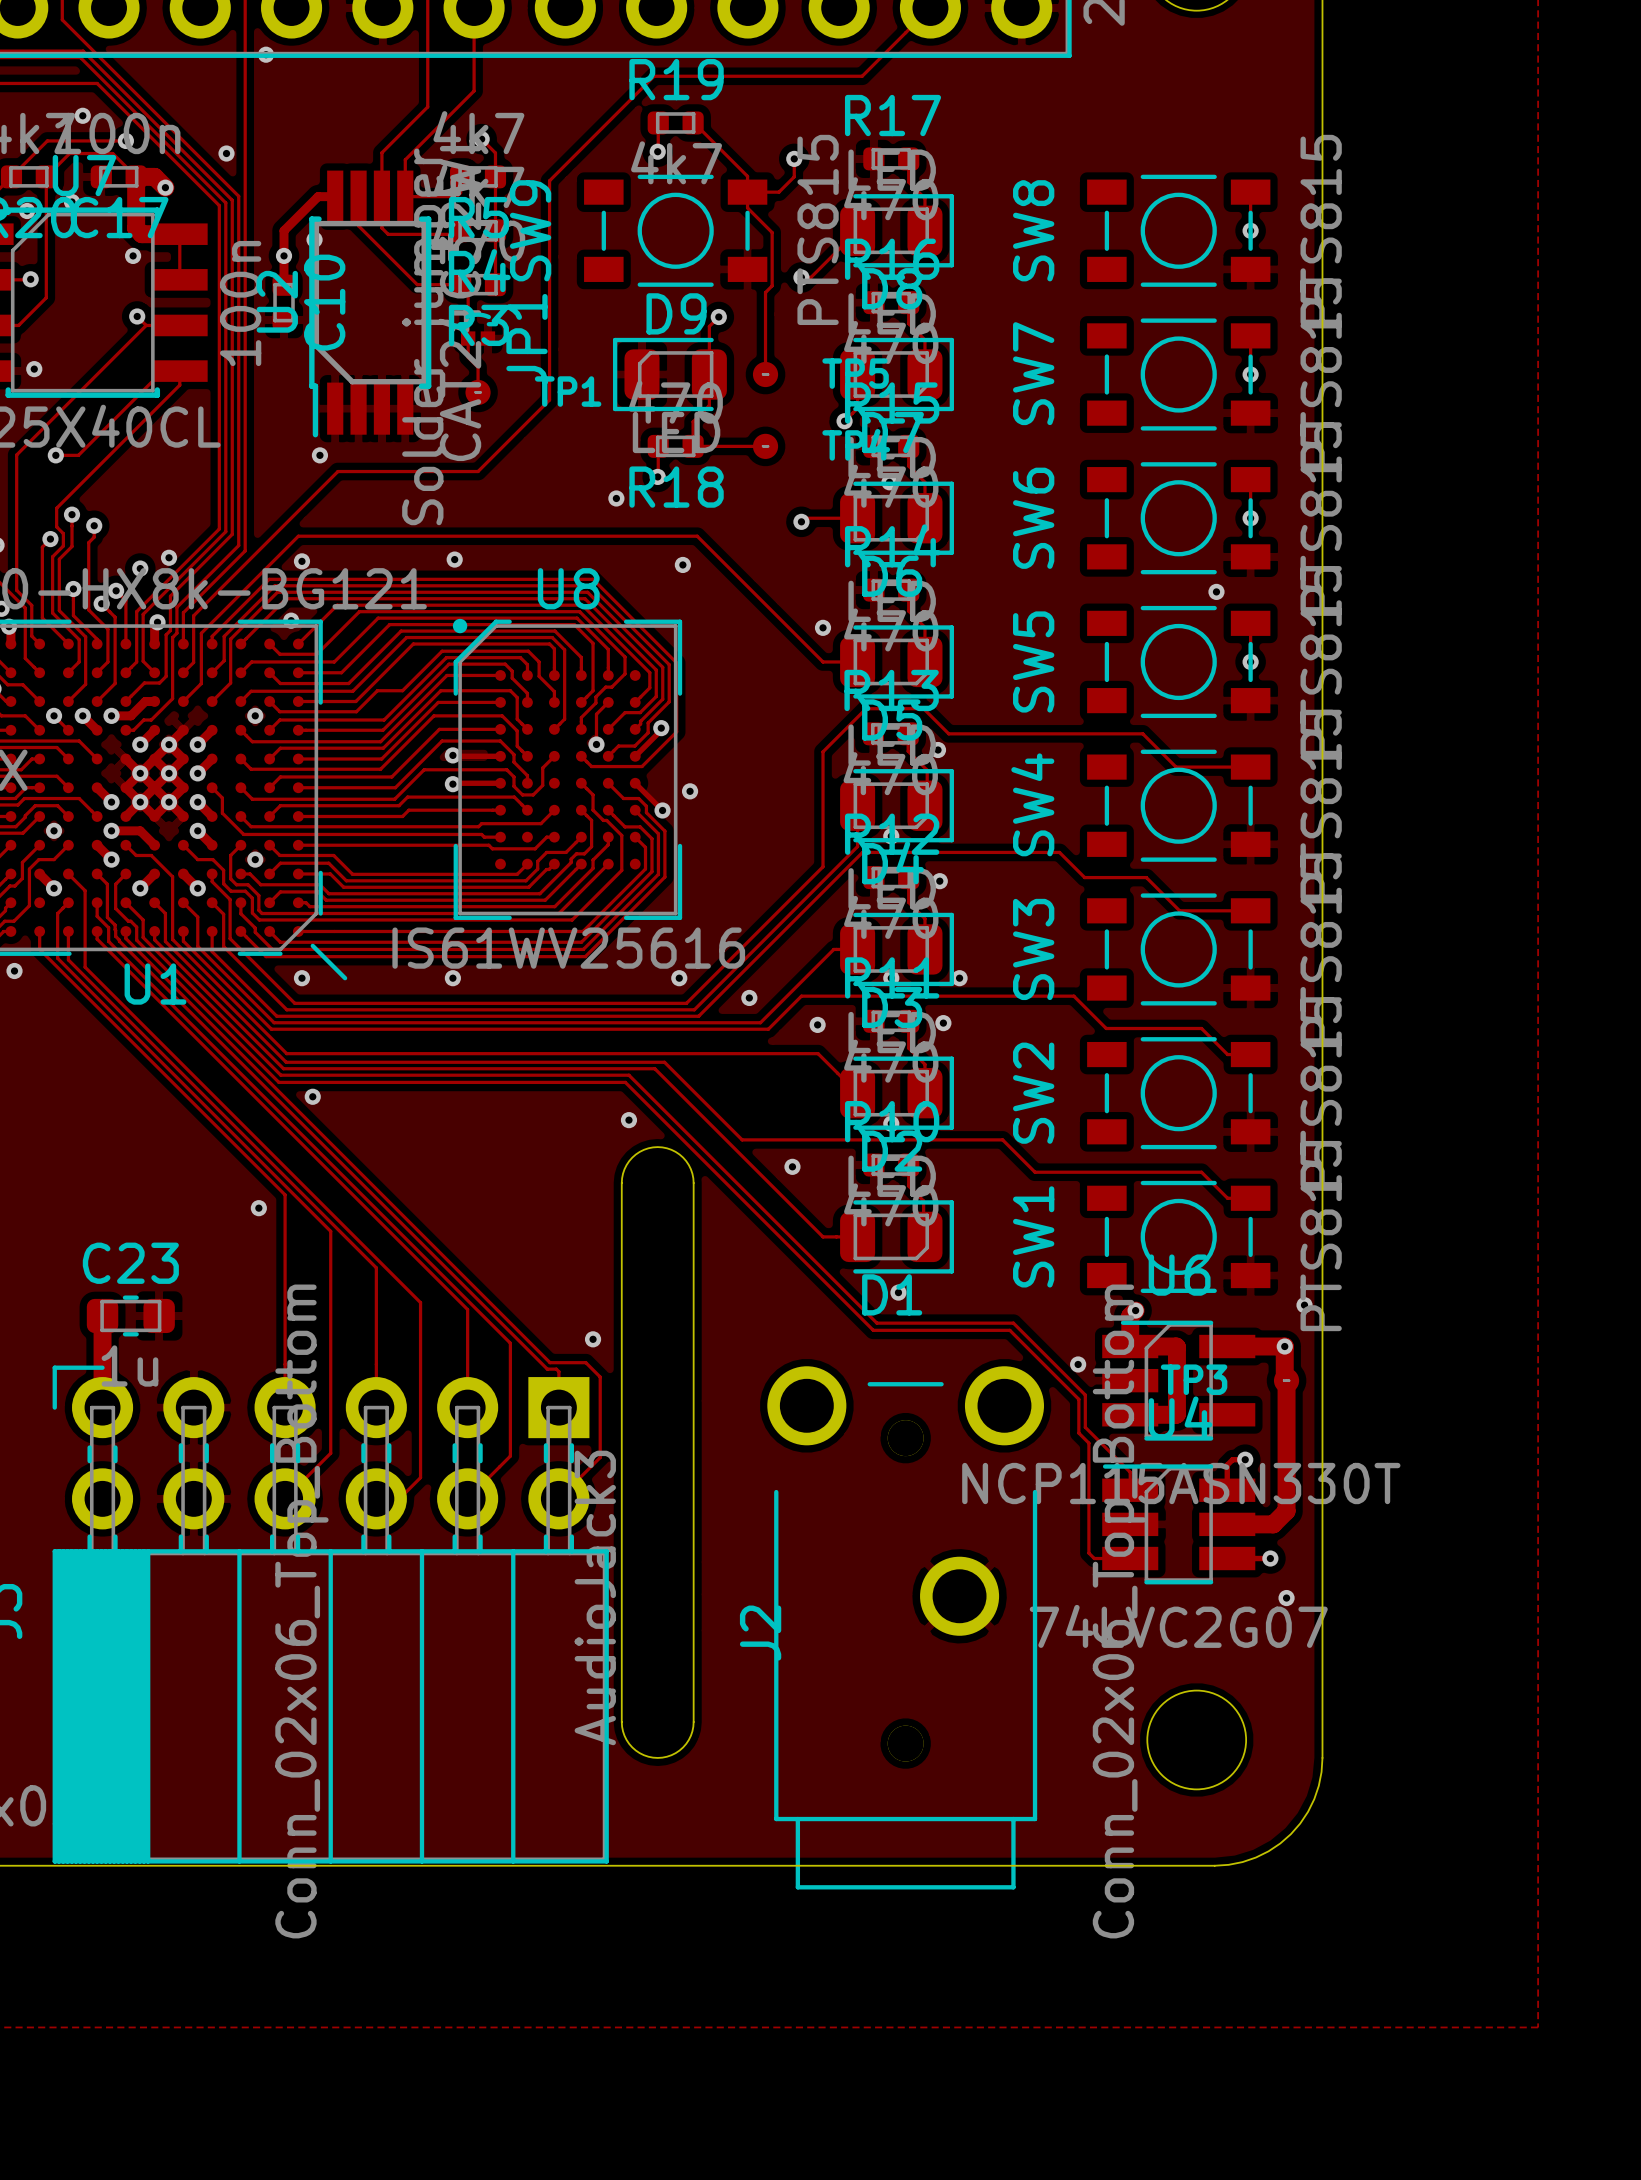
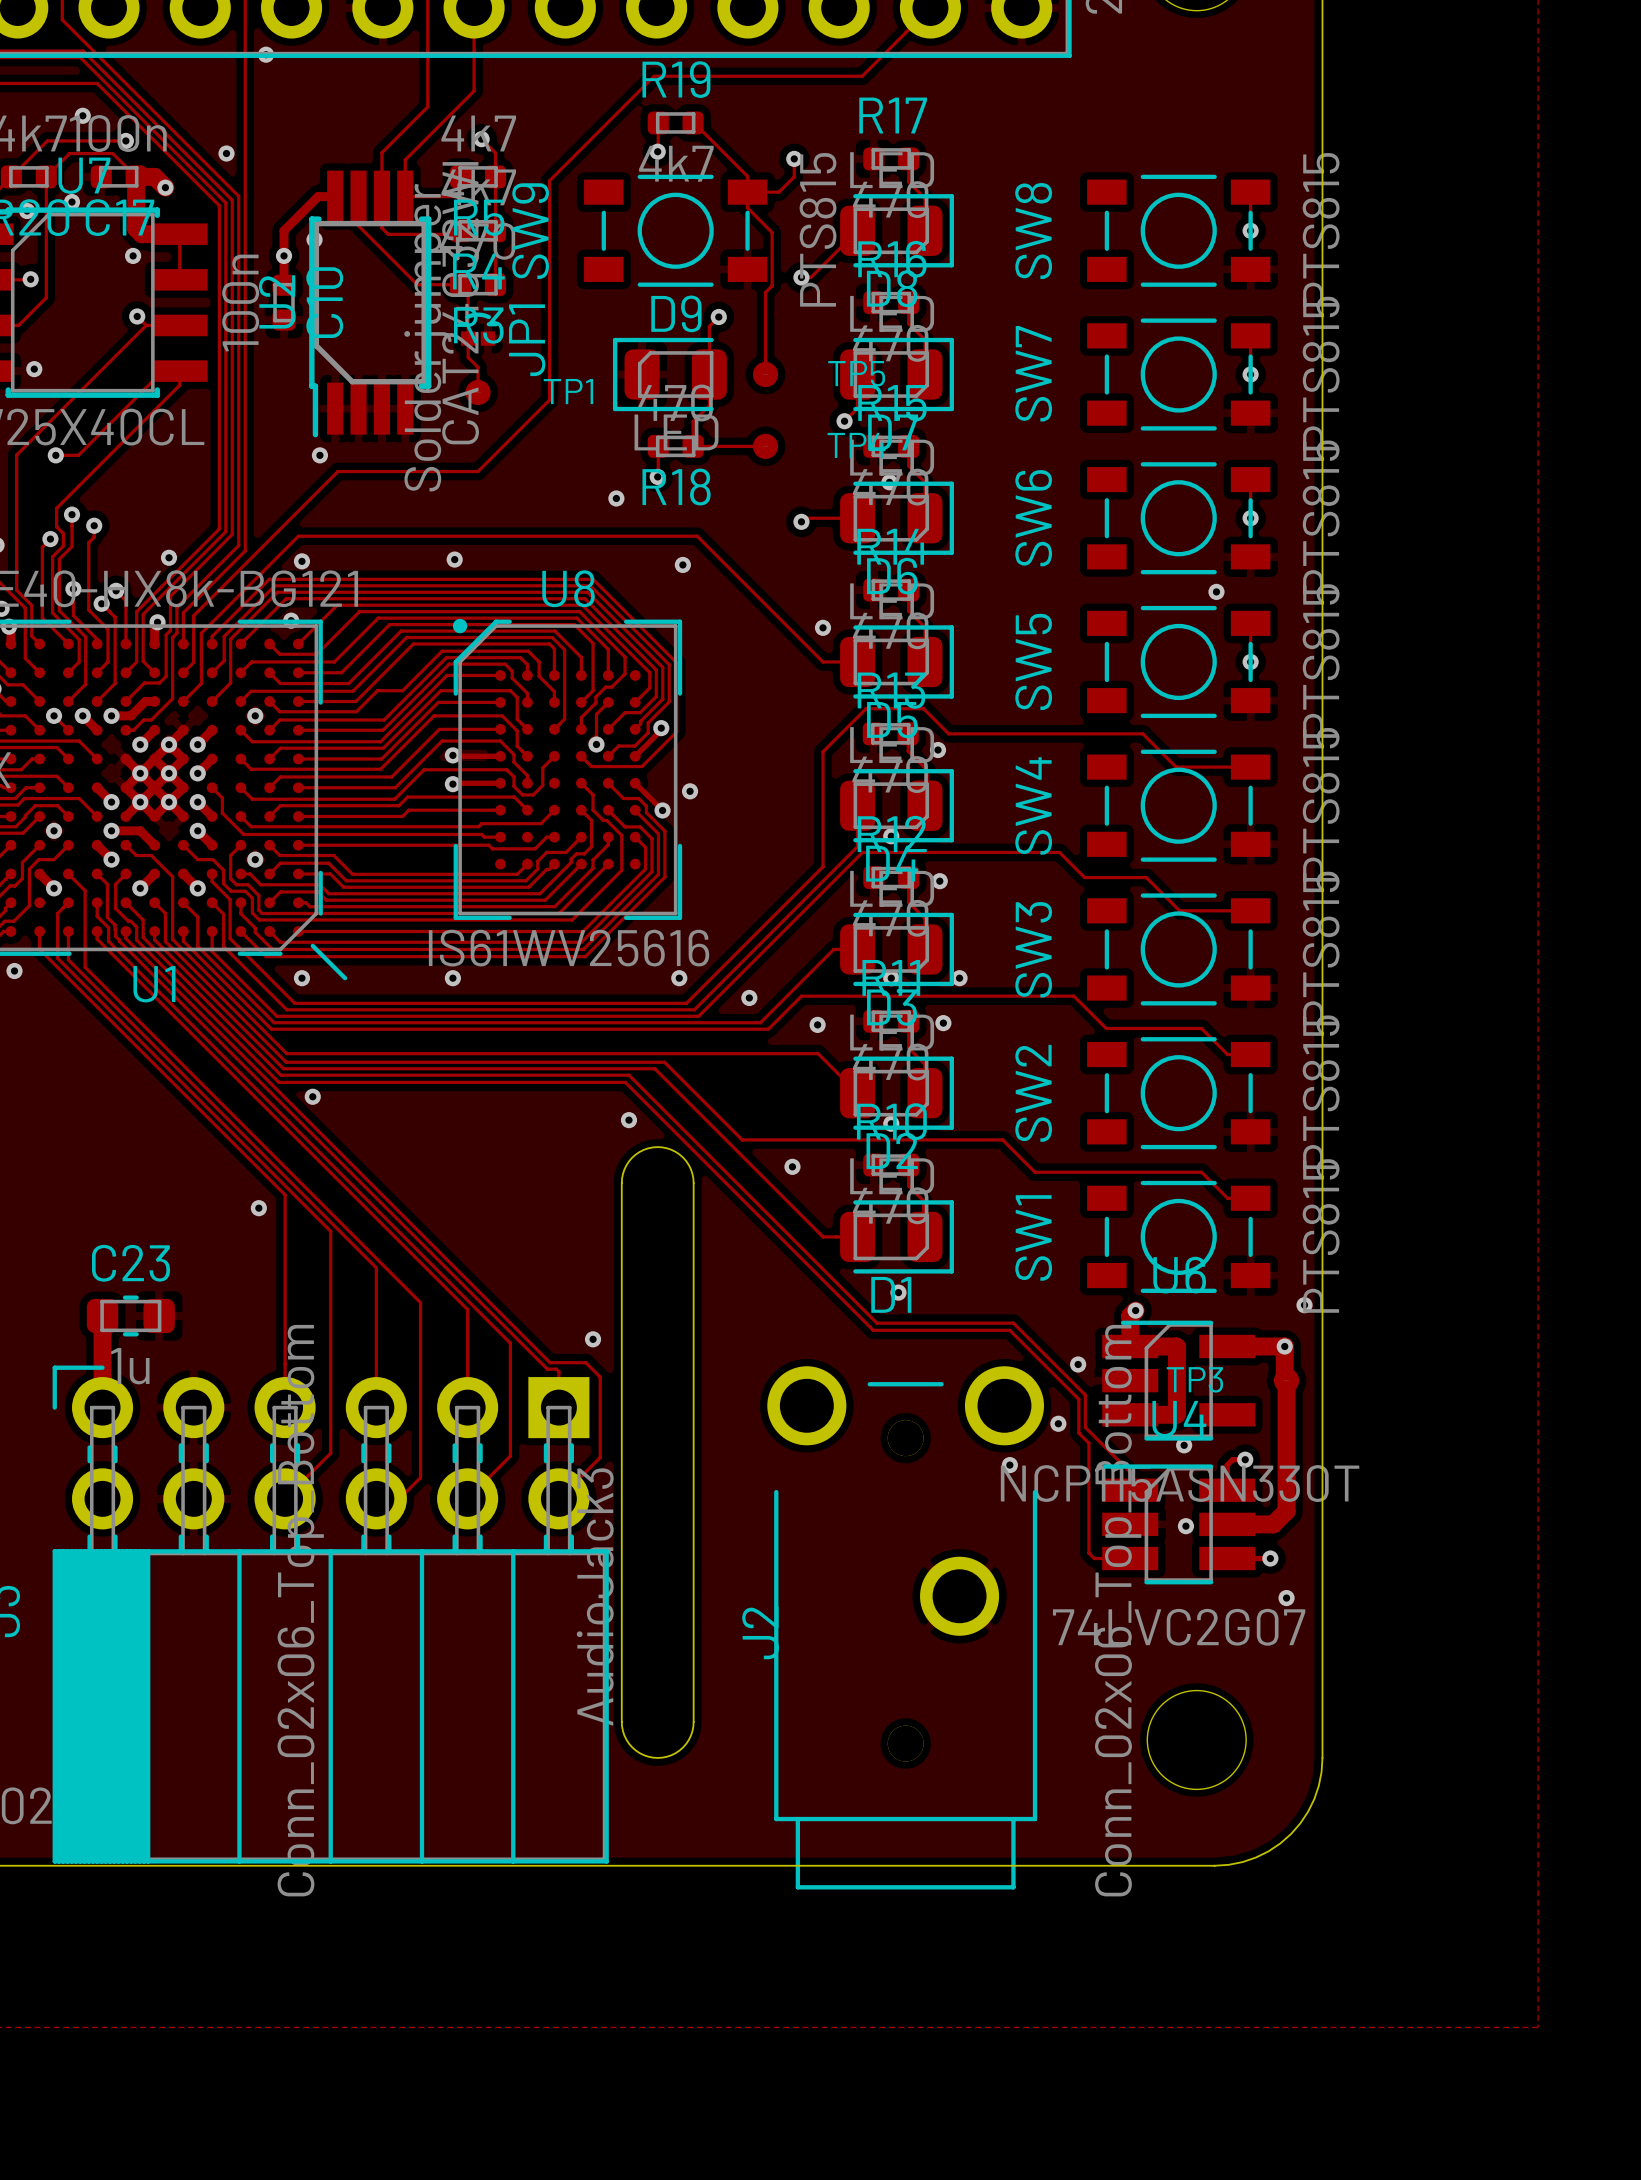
via: (140, 568) -> none
via: none -> (1058, 1423)
via: none -> (1184, 1445)
via: none -> (1009, 1465)
via: none -> (1185, 1526)

